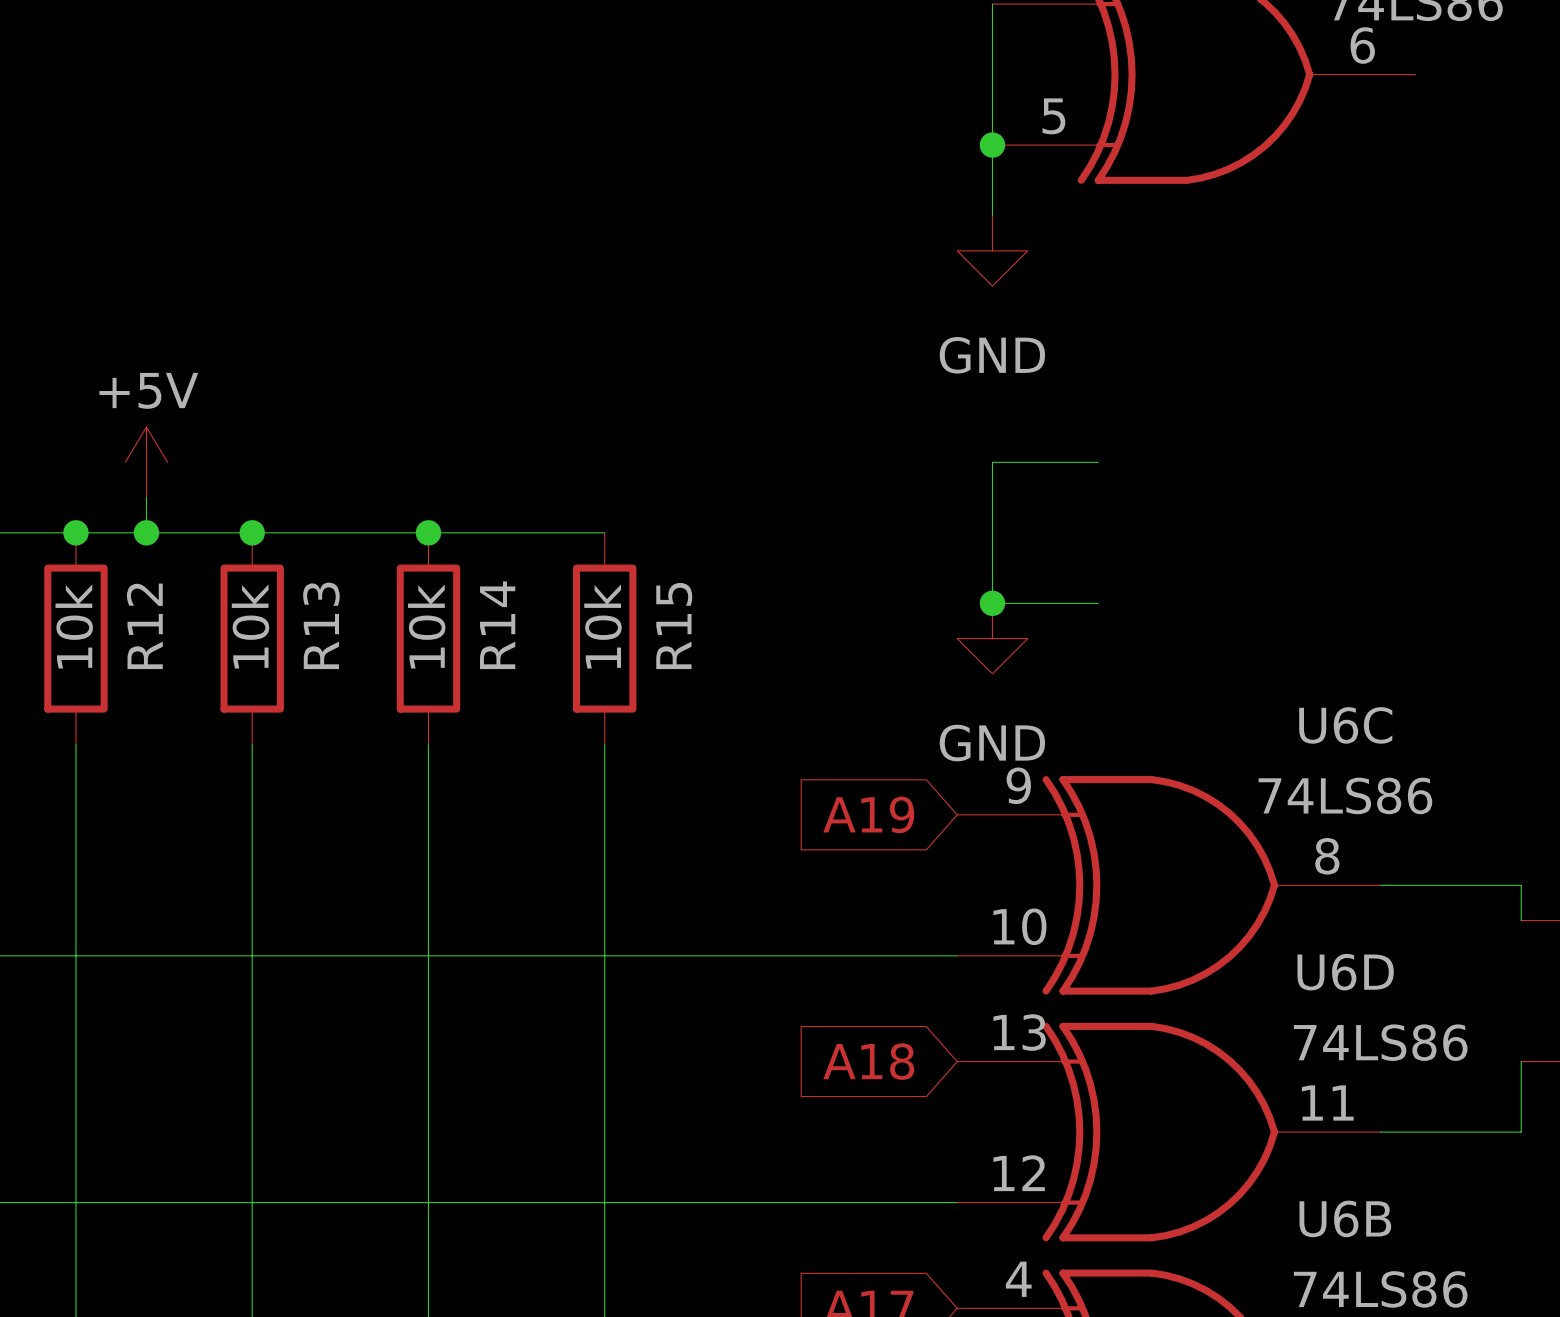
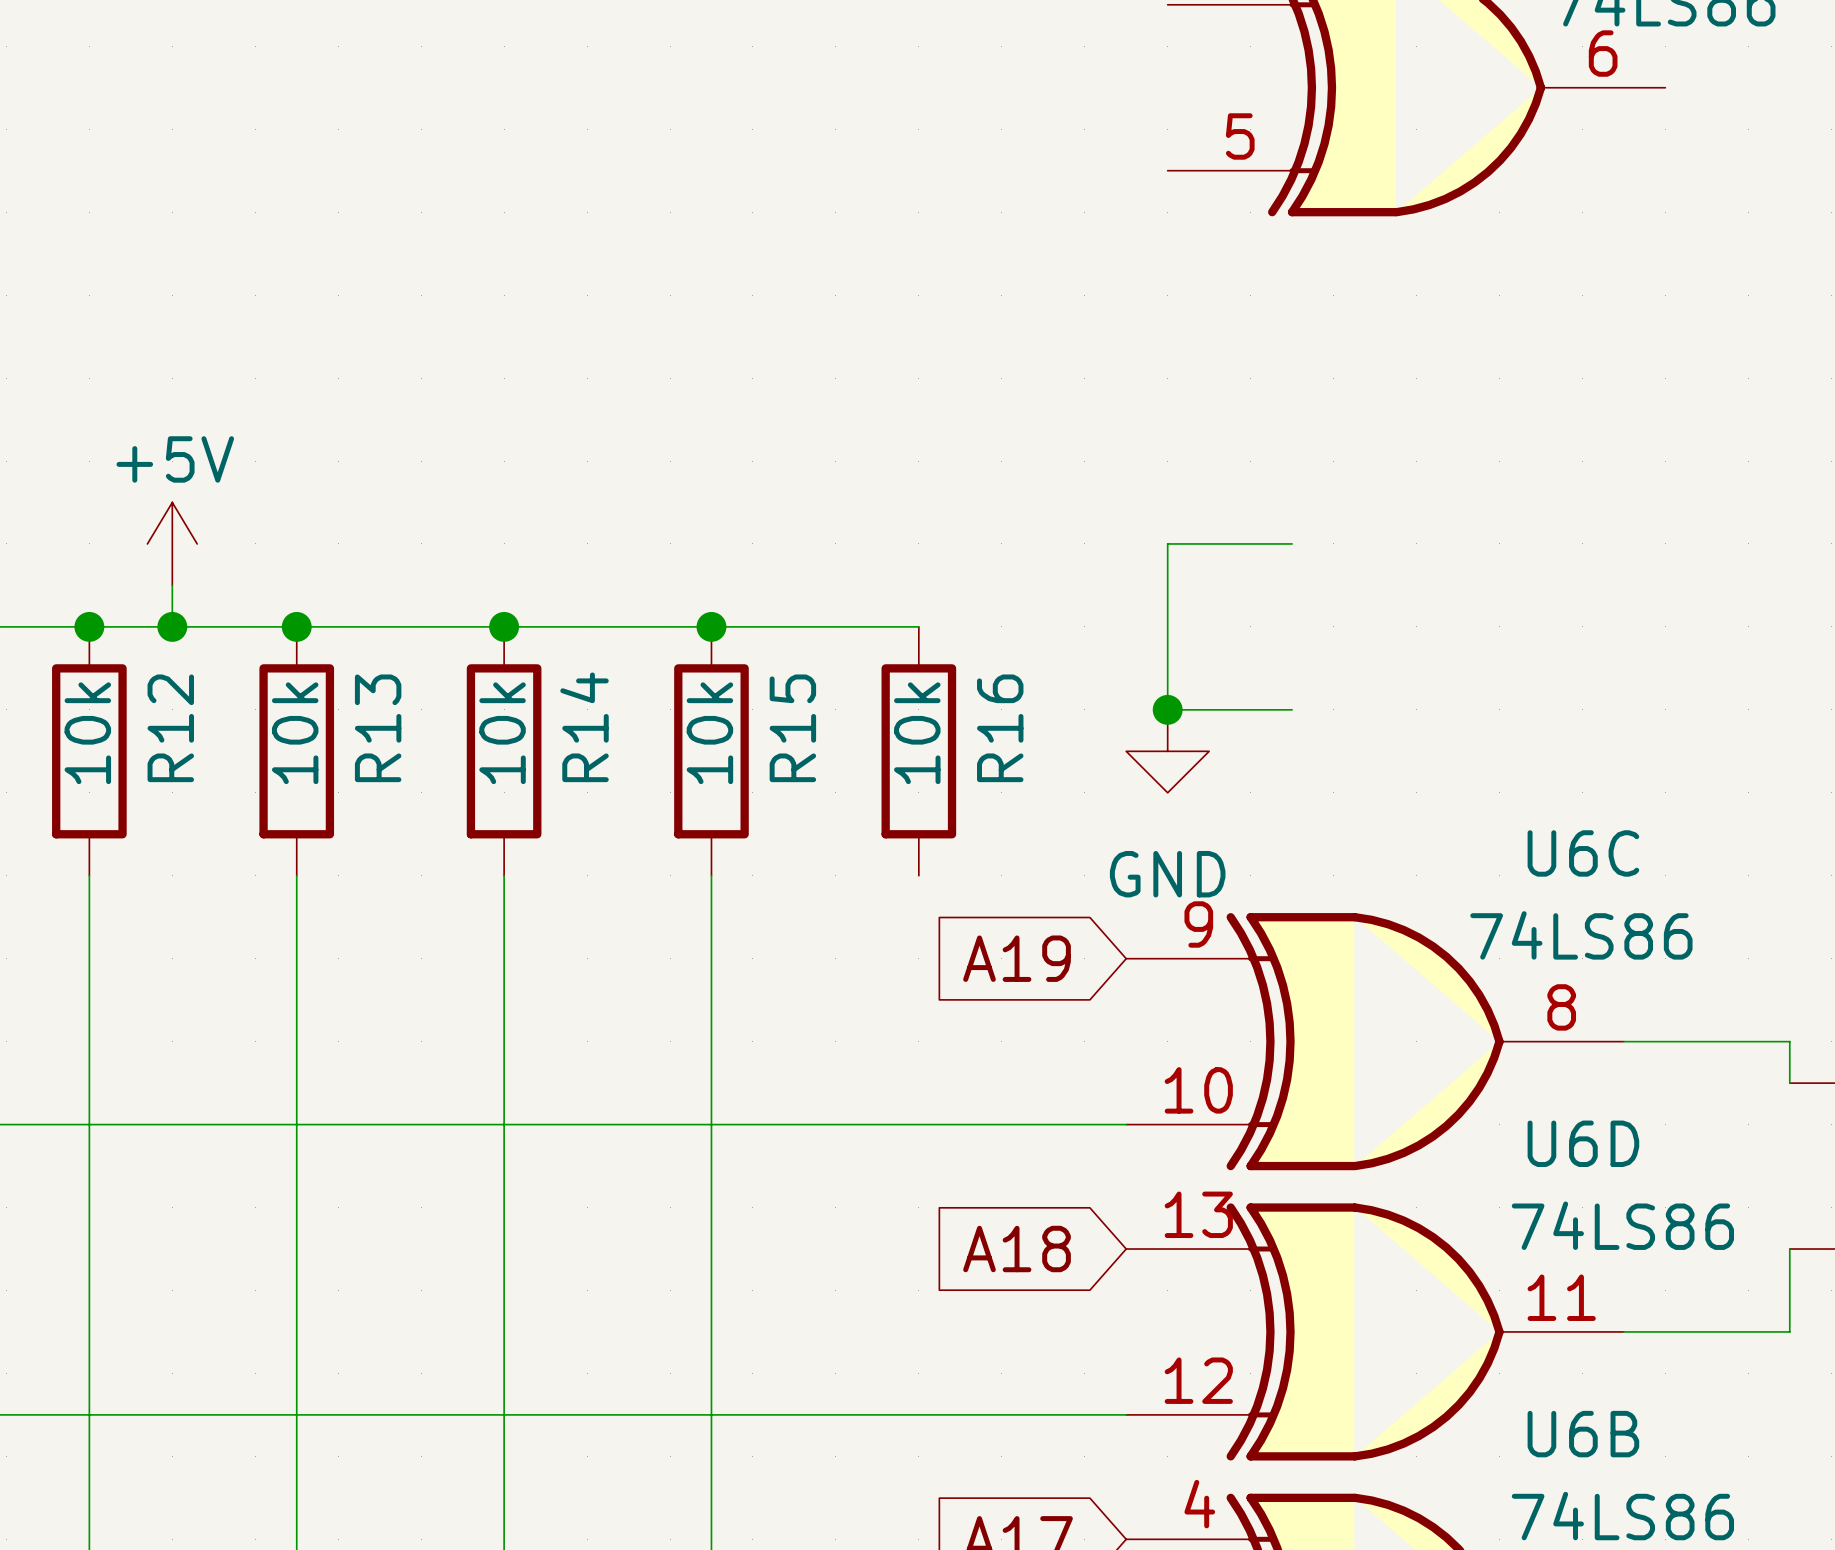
wire: (992, 4) (992, 215) -> none
junction: (992, 145) -> none
power symbol: GND (992, 250) -> none
wire: none -> (711, 626) (918, 626)
junction: none -> (711, 626)
R16: none -> 10k (918, 751)

